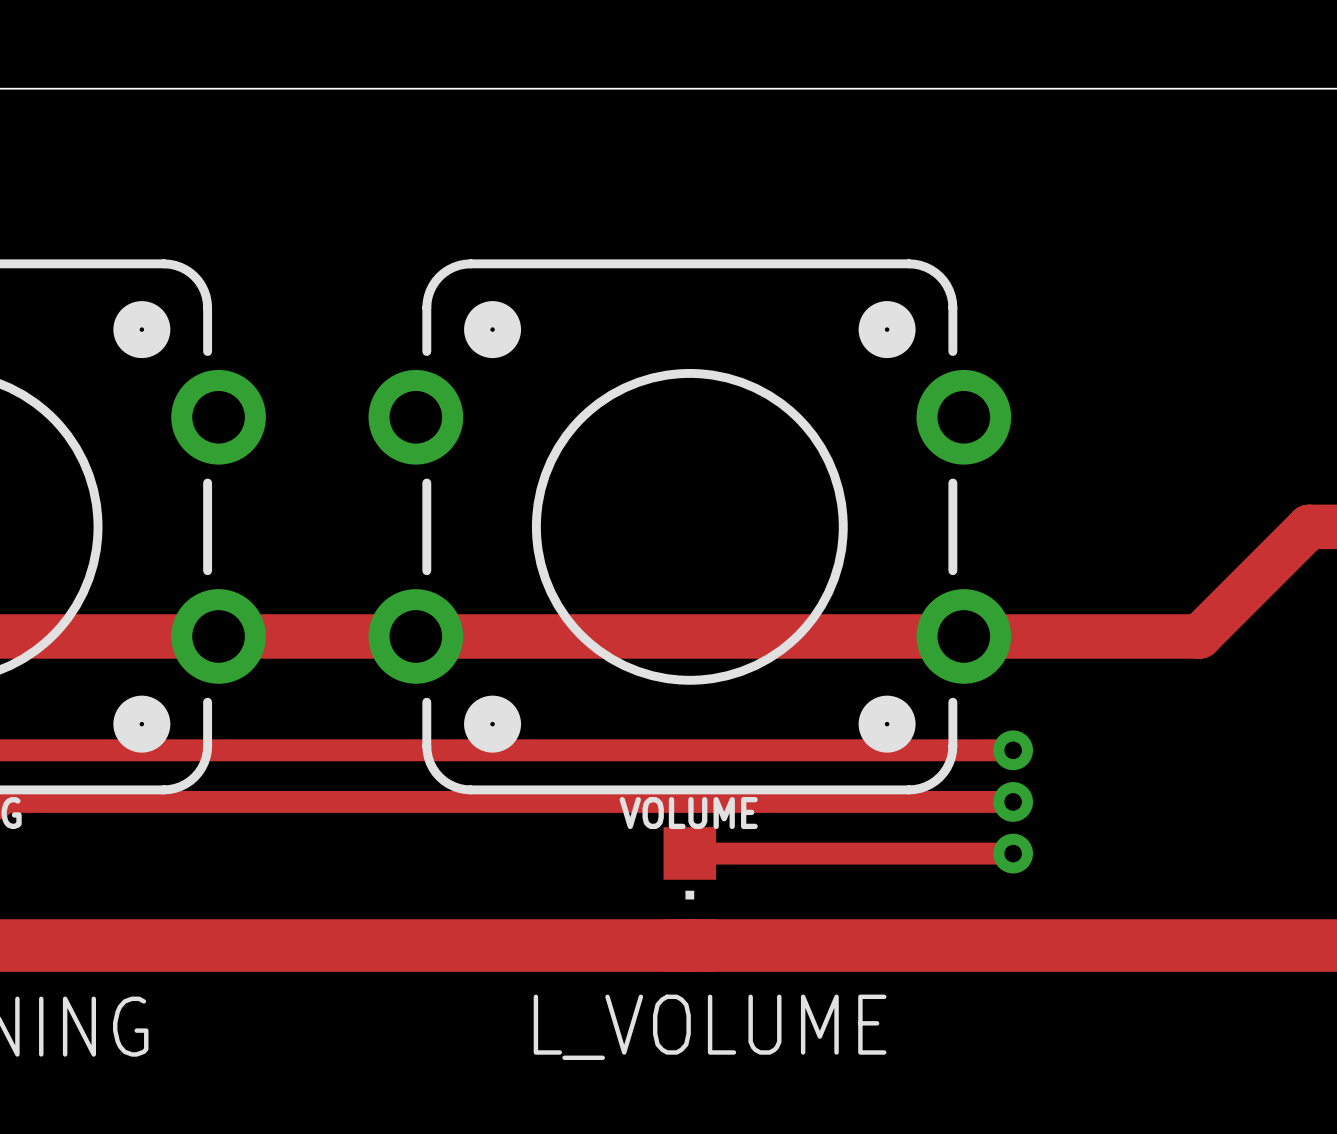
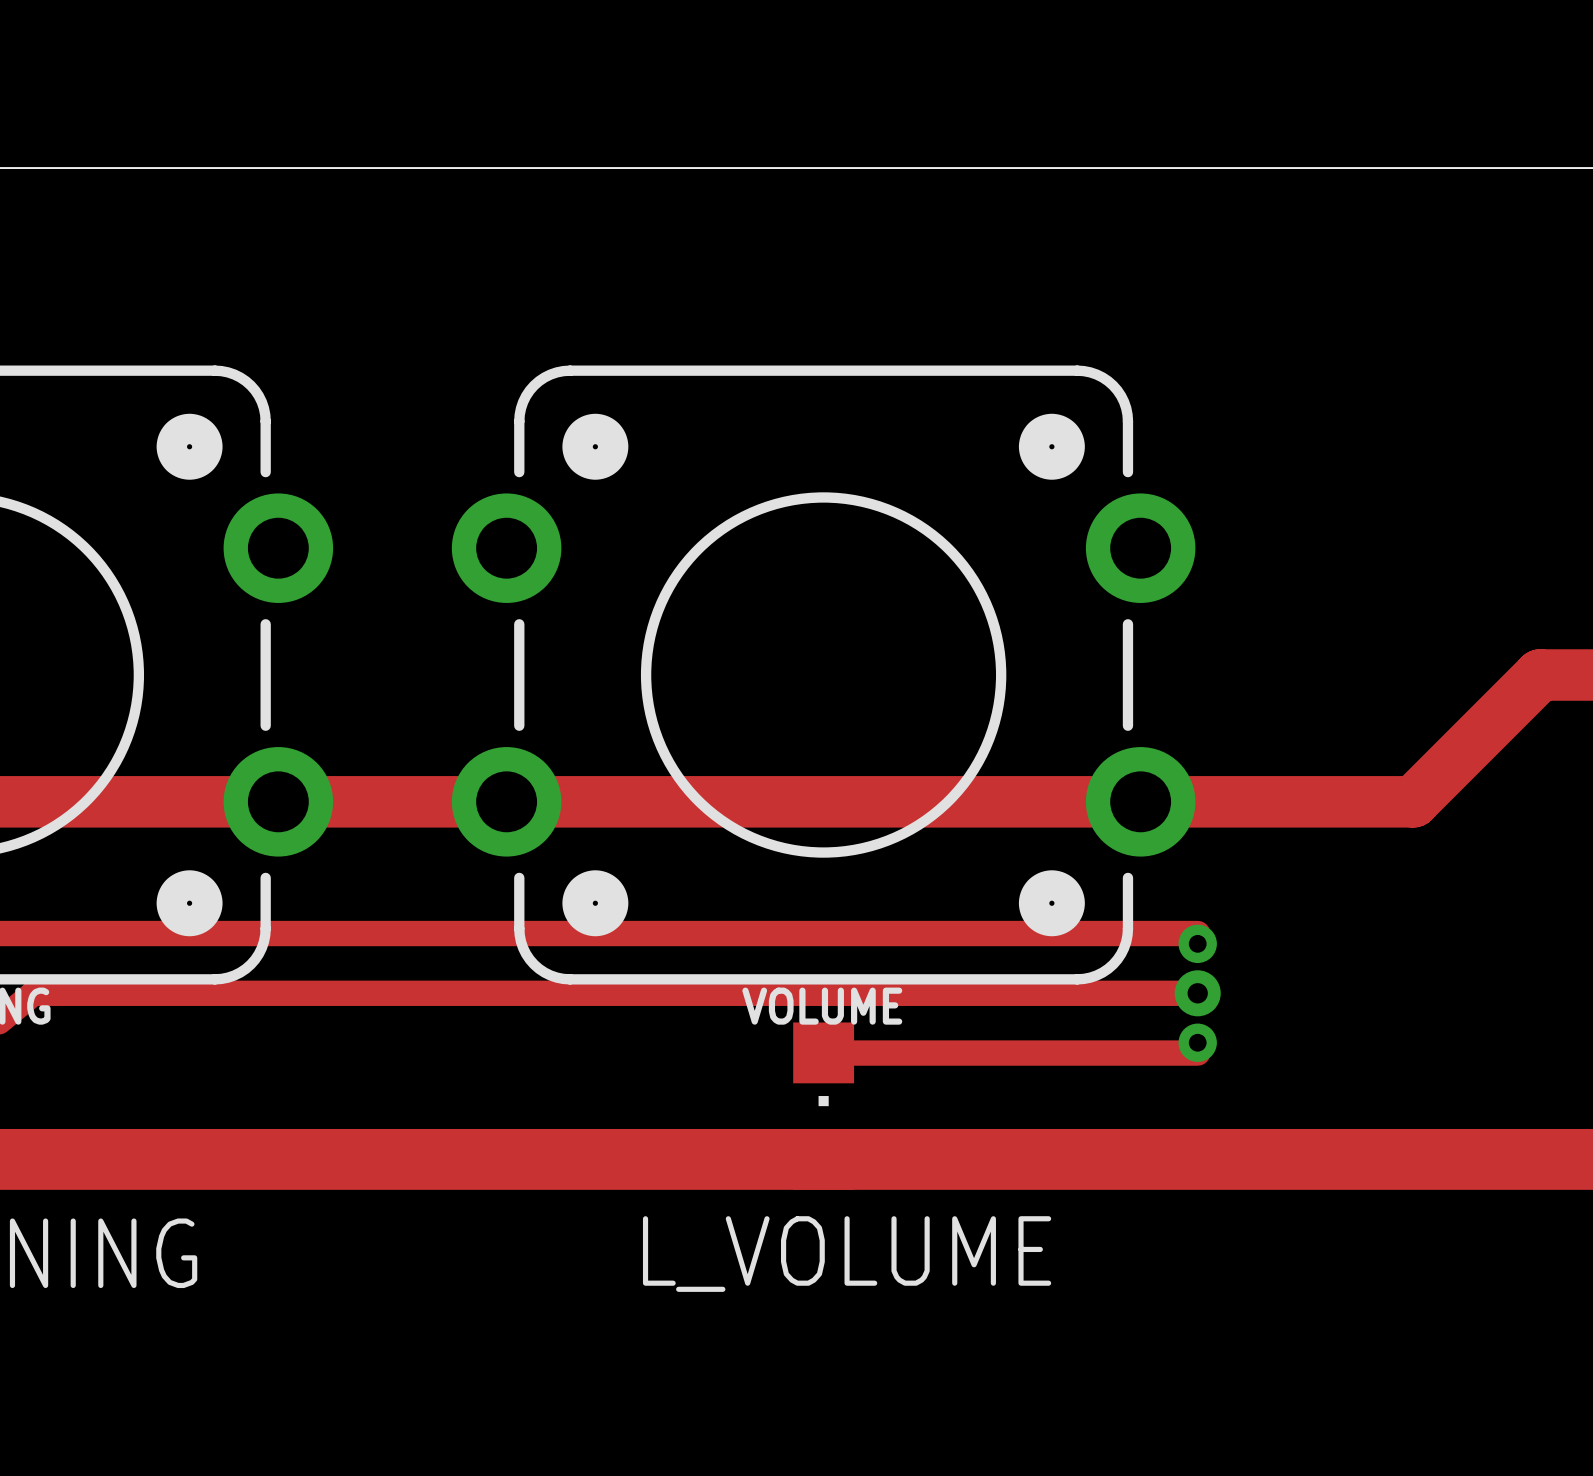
via size: [993, 730, 1034, 771] -> [1178, 924, 1217, 964]
via size: [993, 833, 1034, 874] -> [1178, 1023, 1217, 1062]

